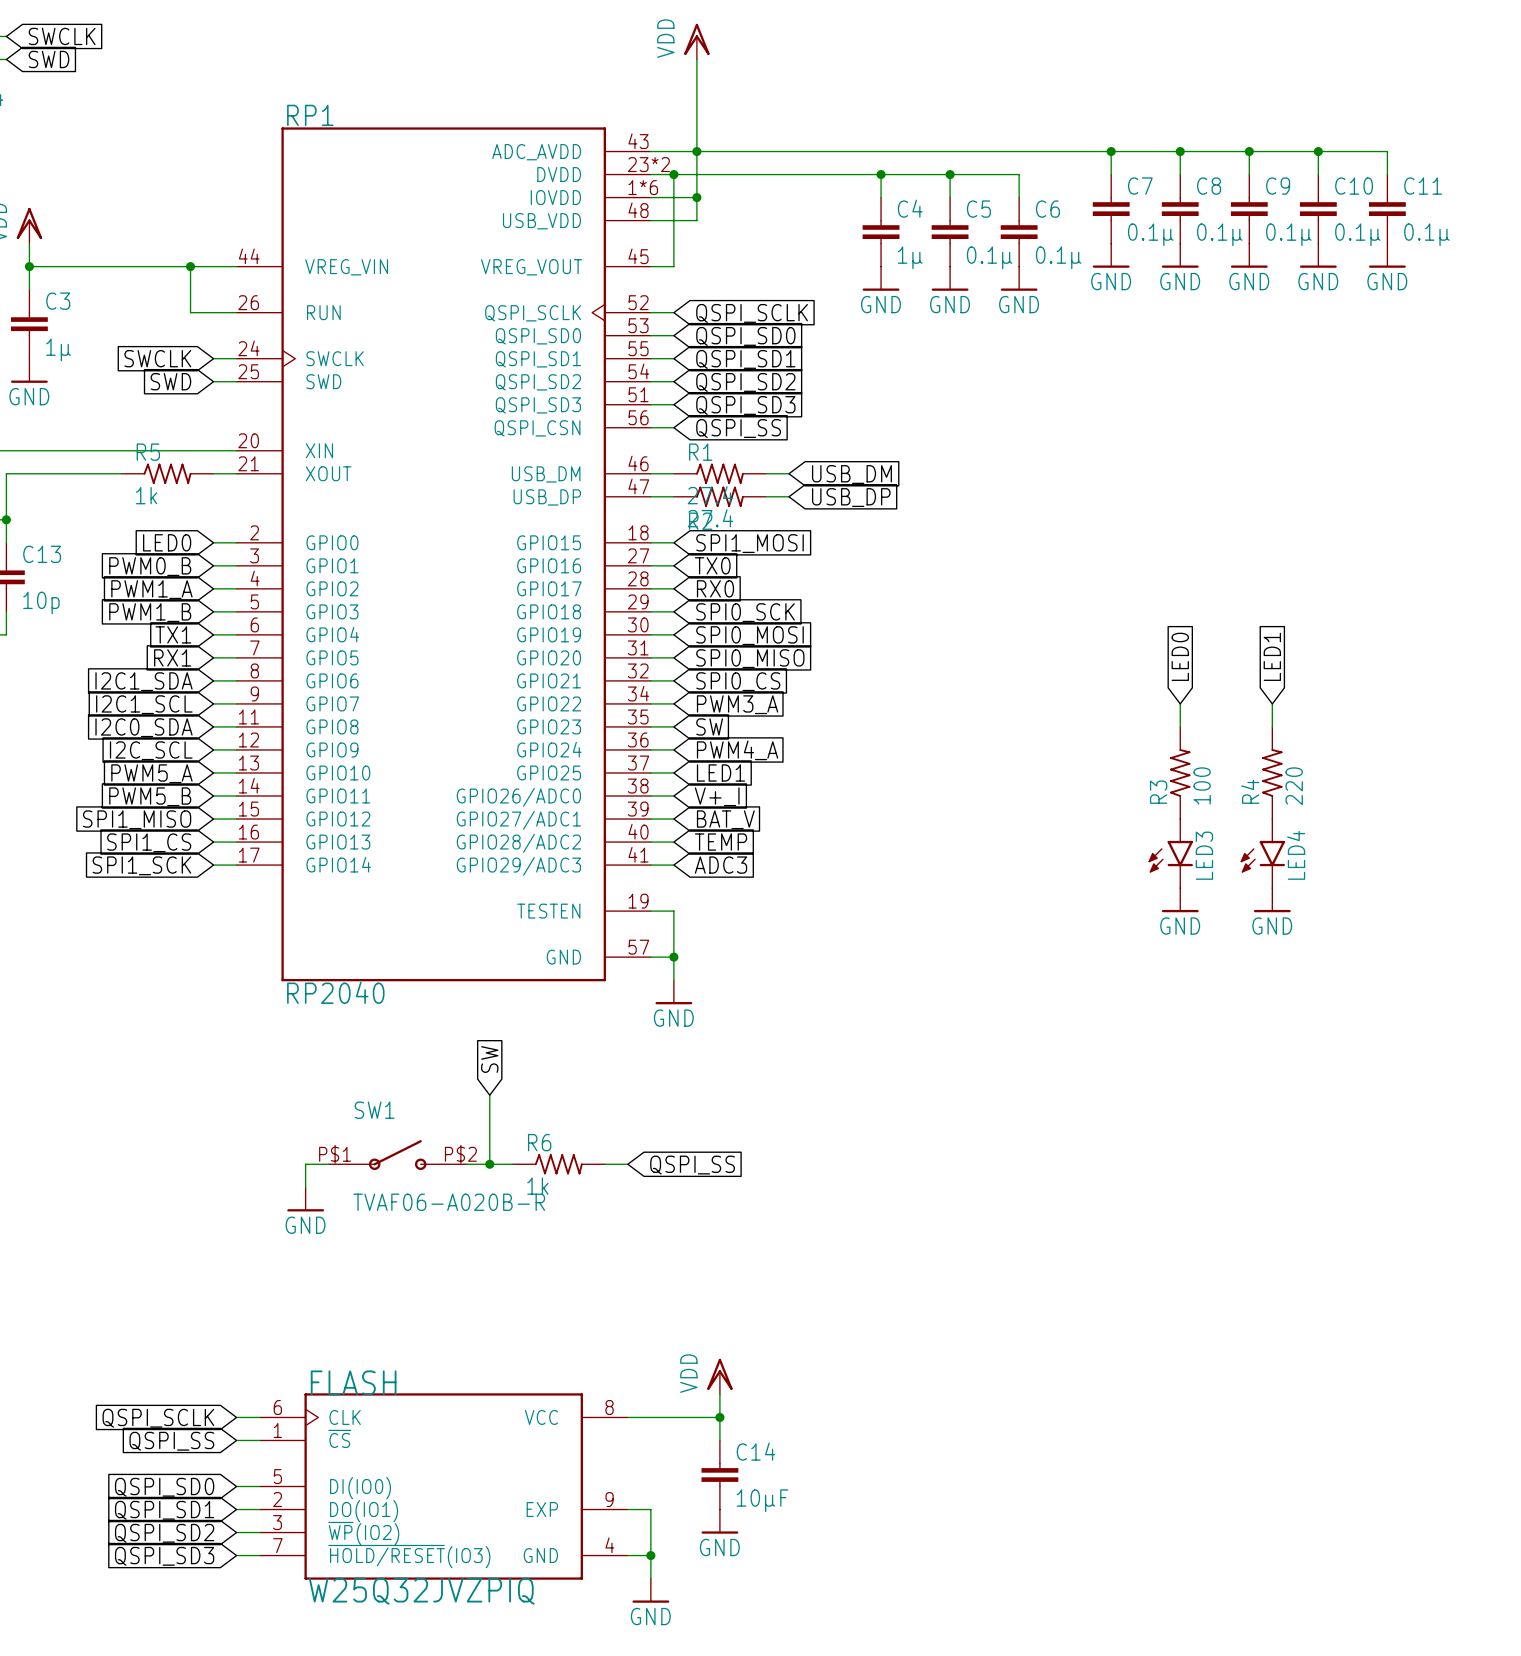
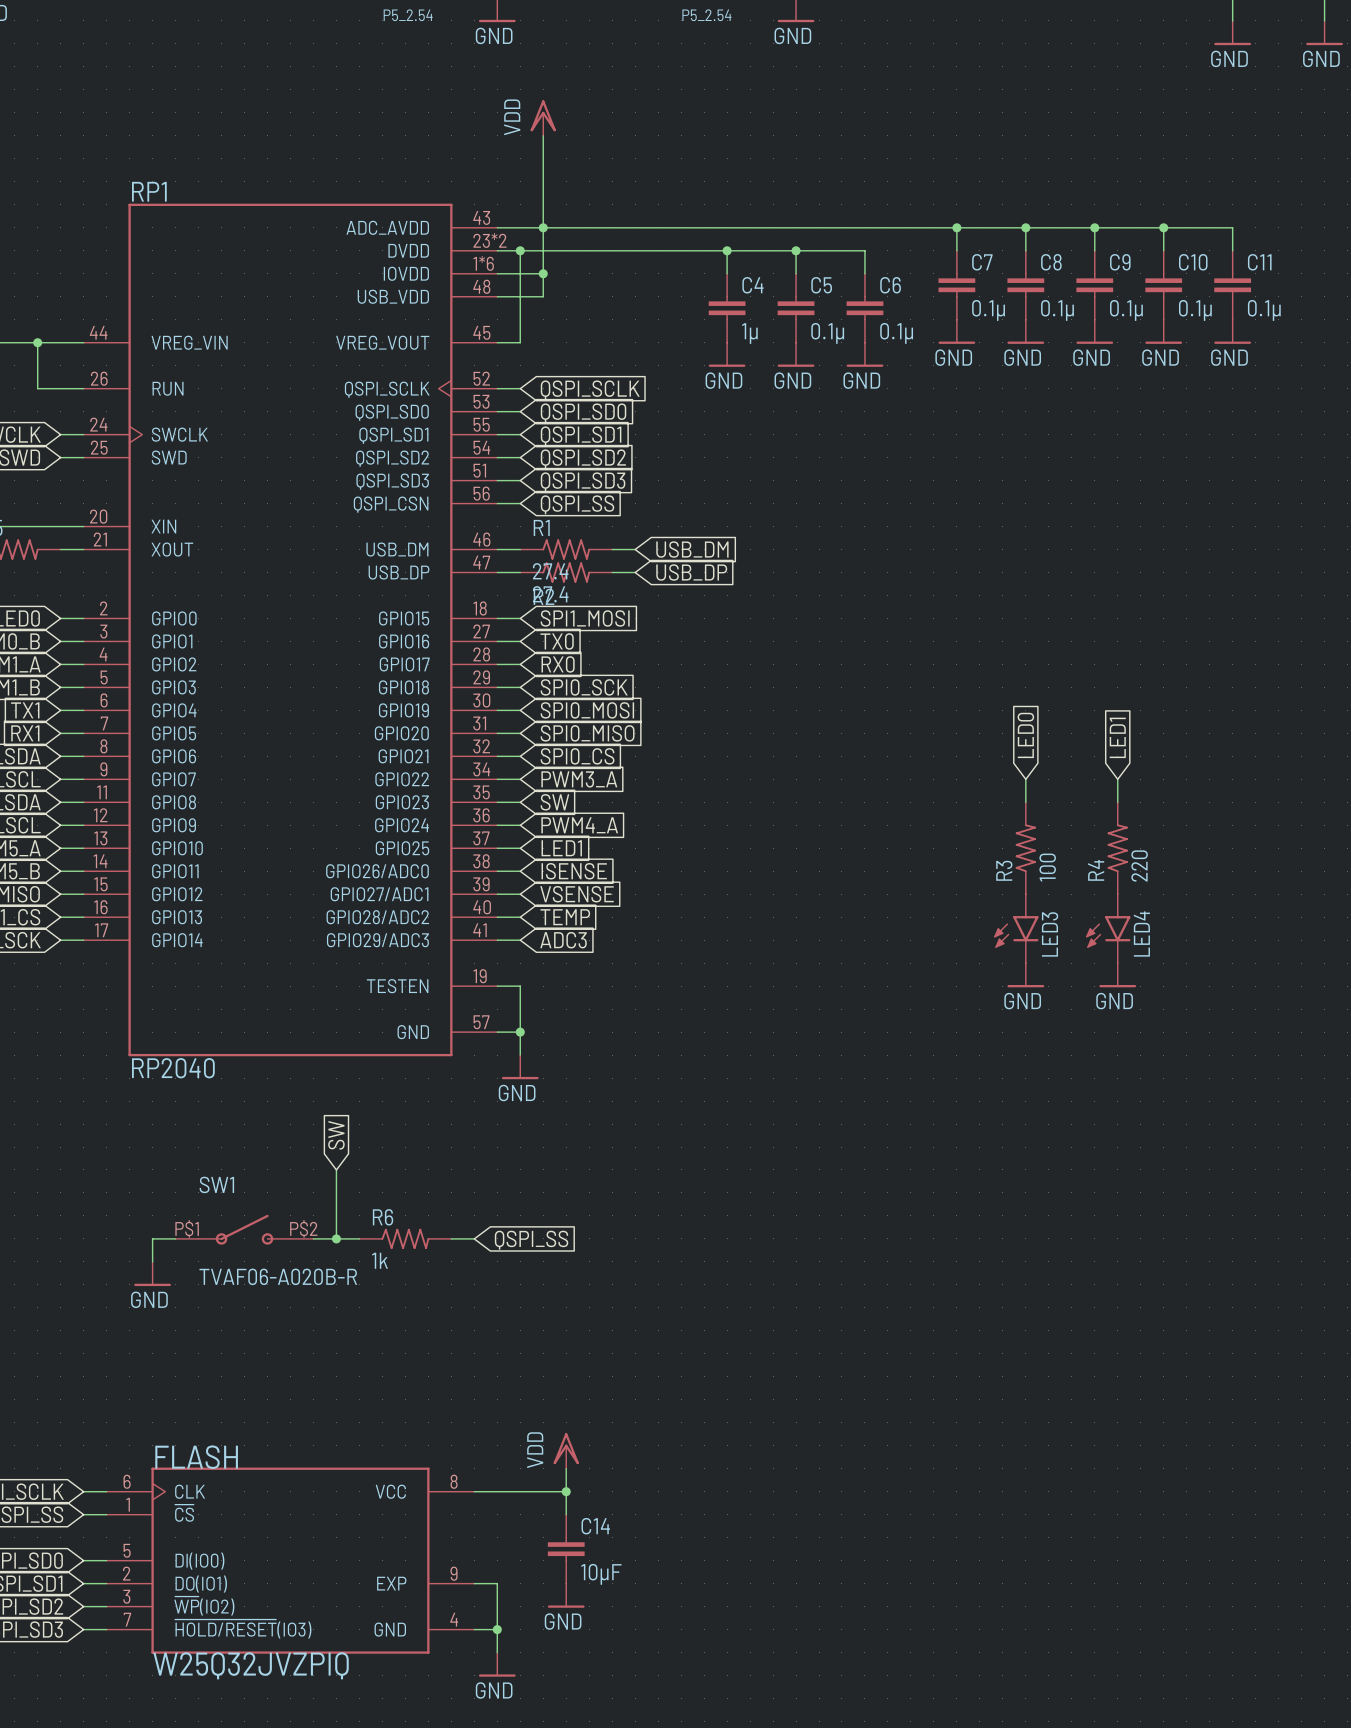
global label: V+_I (717, 796) -> ISENSE (574, 871)
global label: BAT_V (725, 819) -> VSENSE (577, 894)

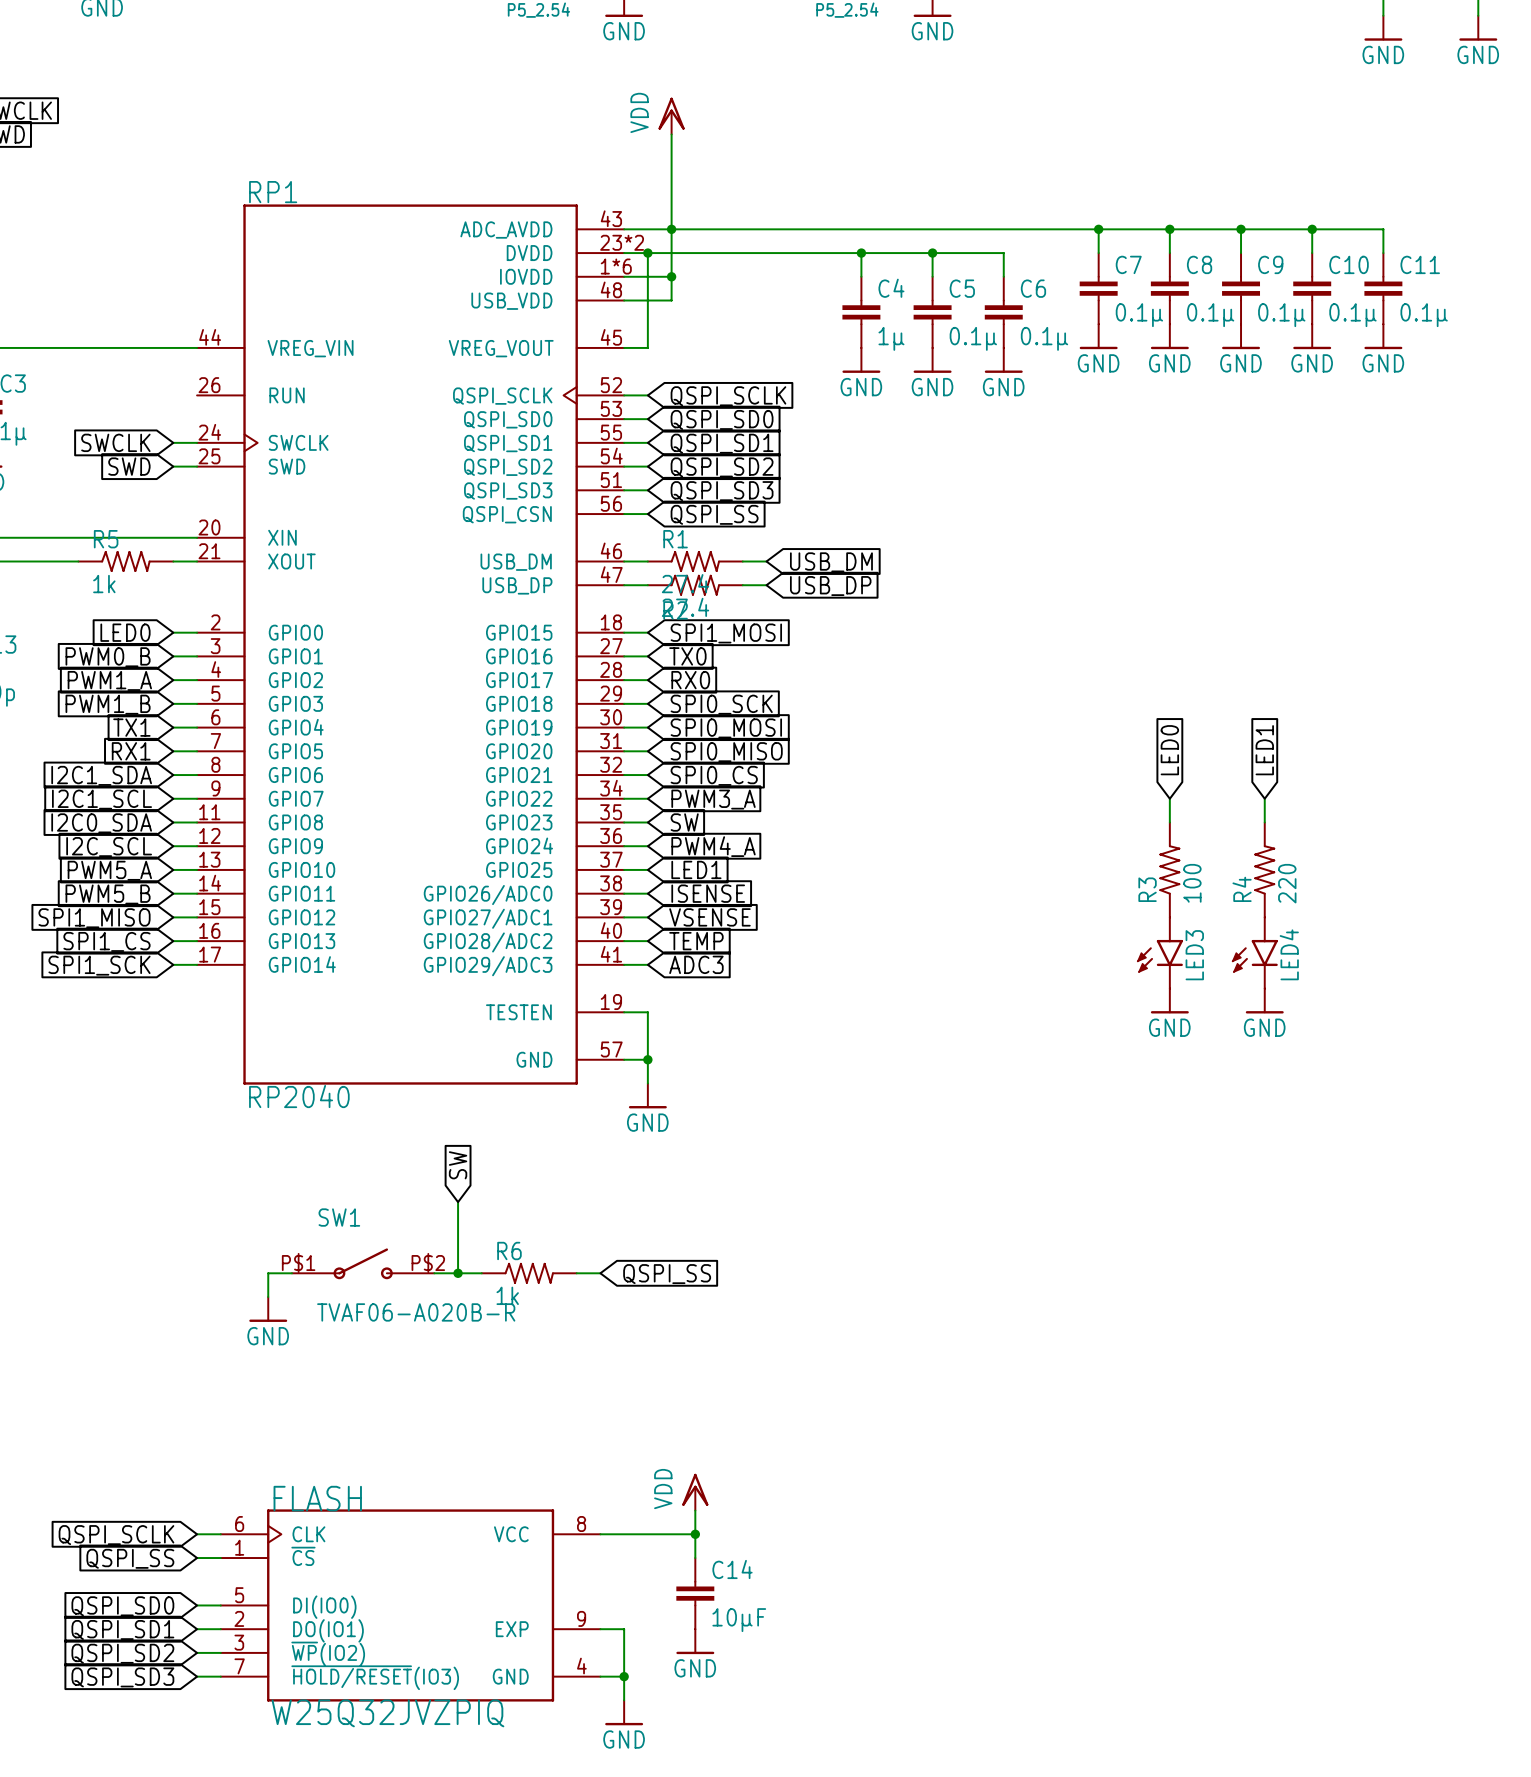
wire: (37, 342) (37, 388) (83, 388) -> none
junction: (37, 342) -> none

